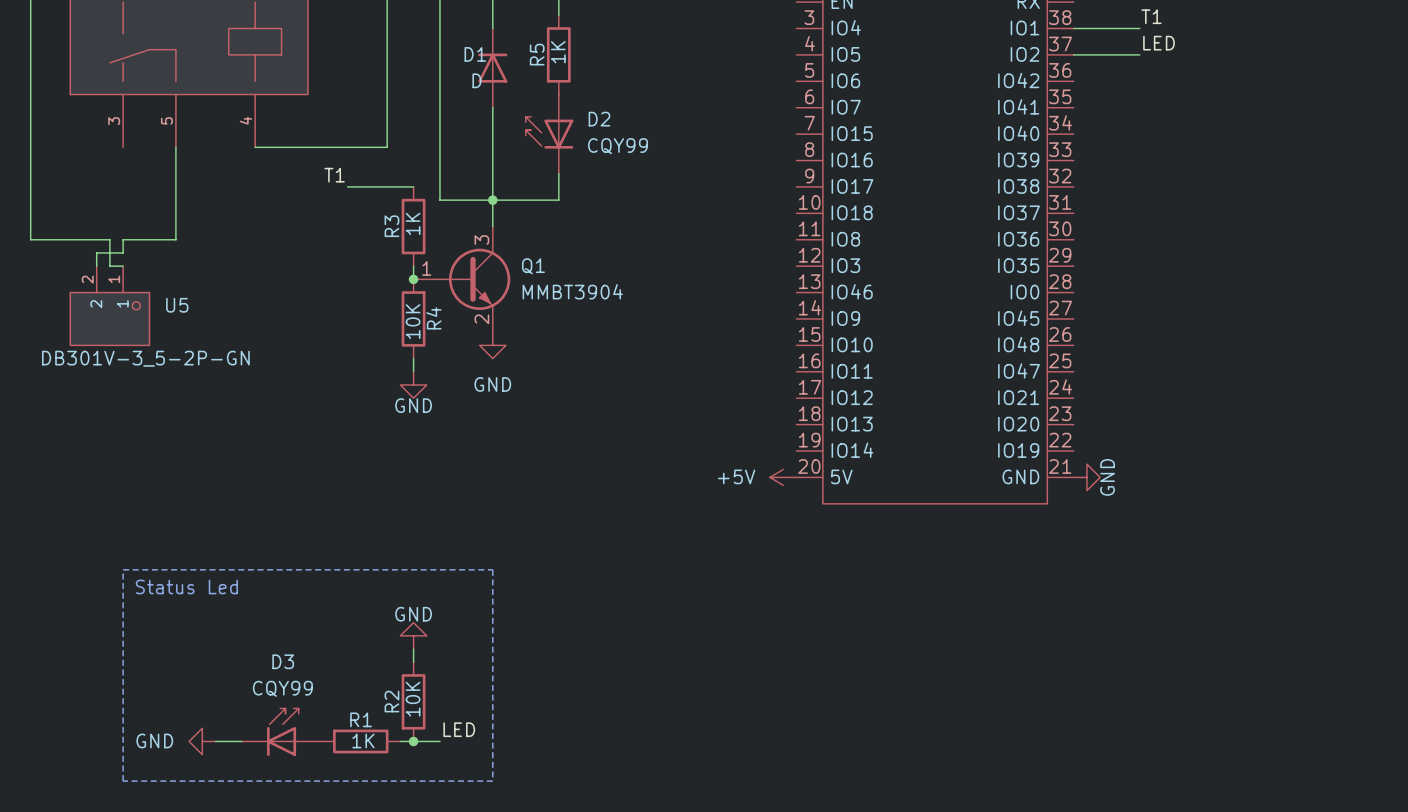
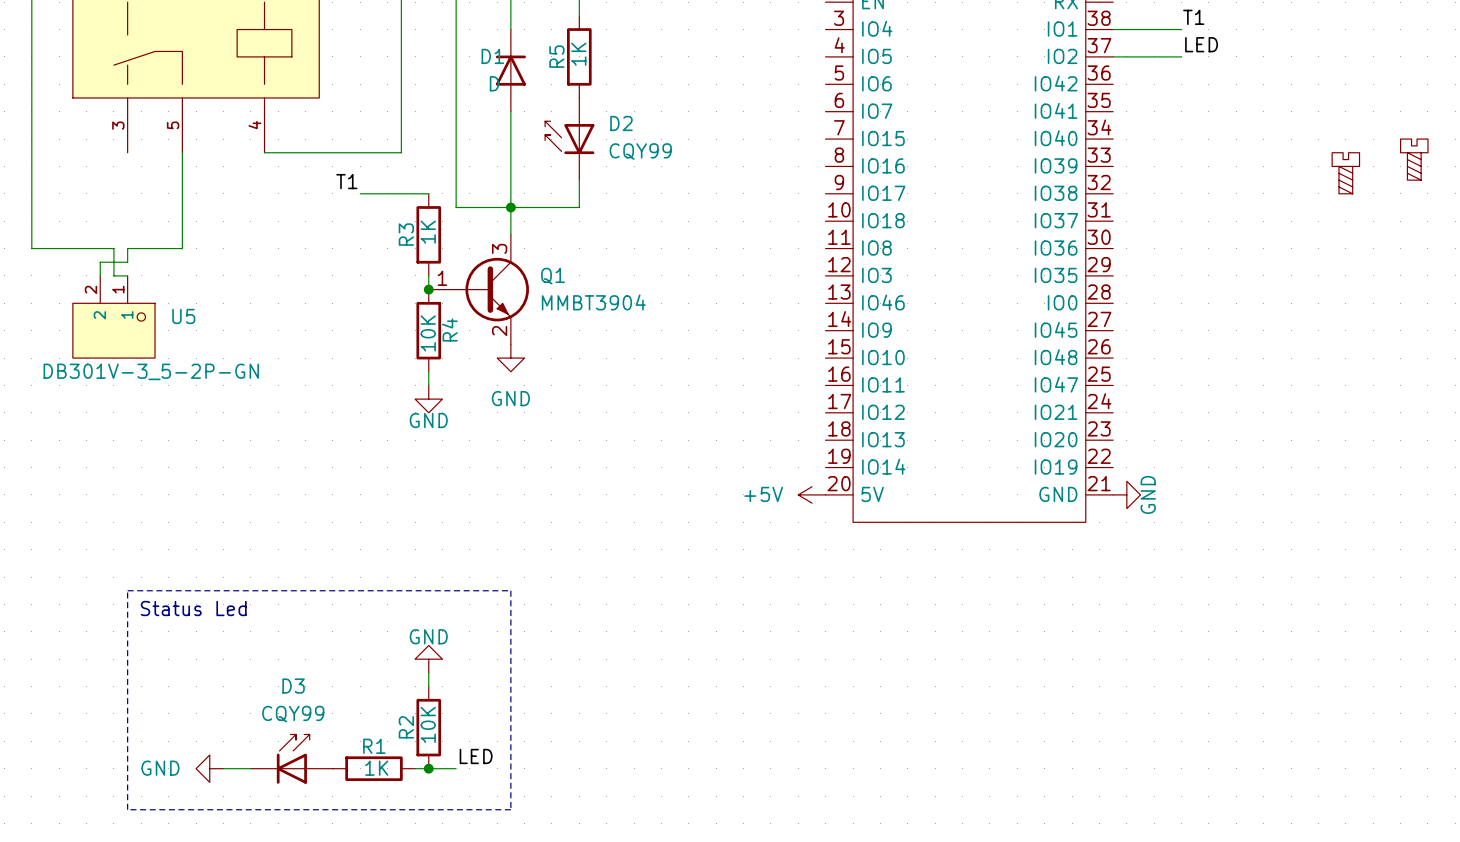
part: none -> (1414, 159)
part: none -> (1345, 173)

